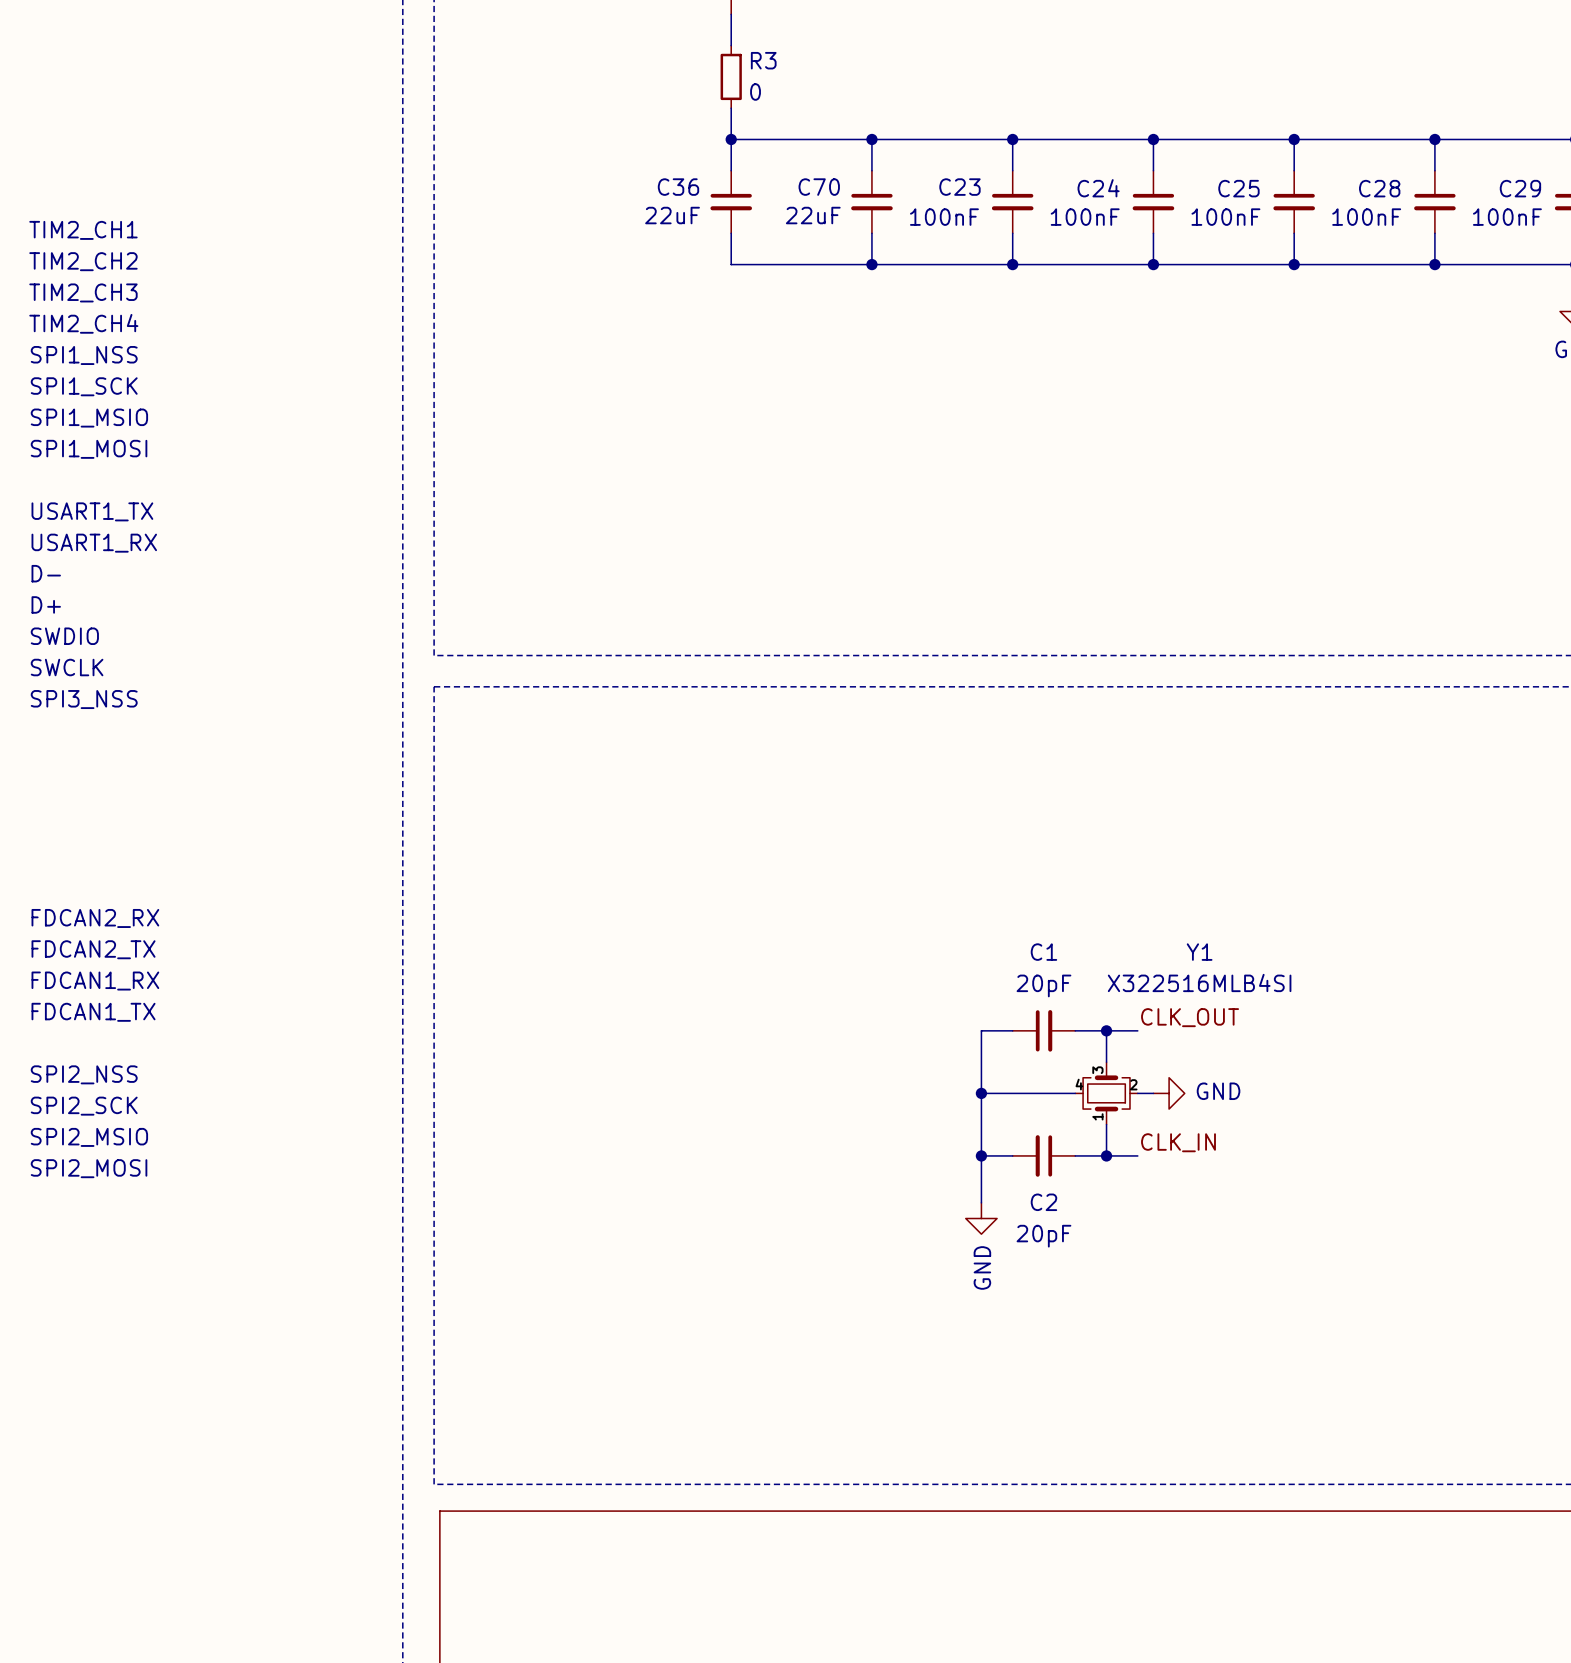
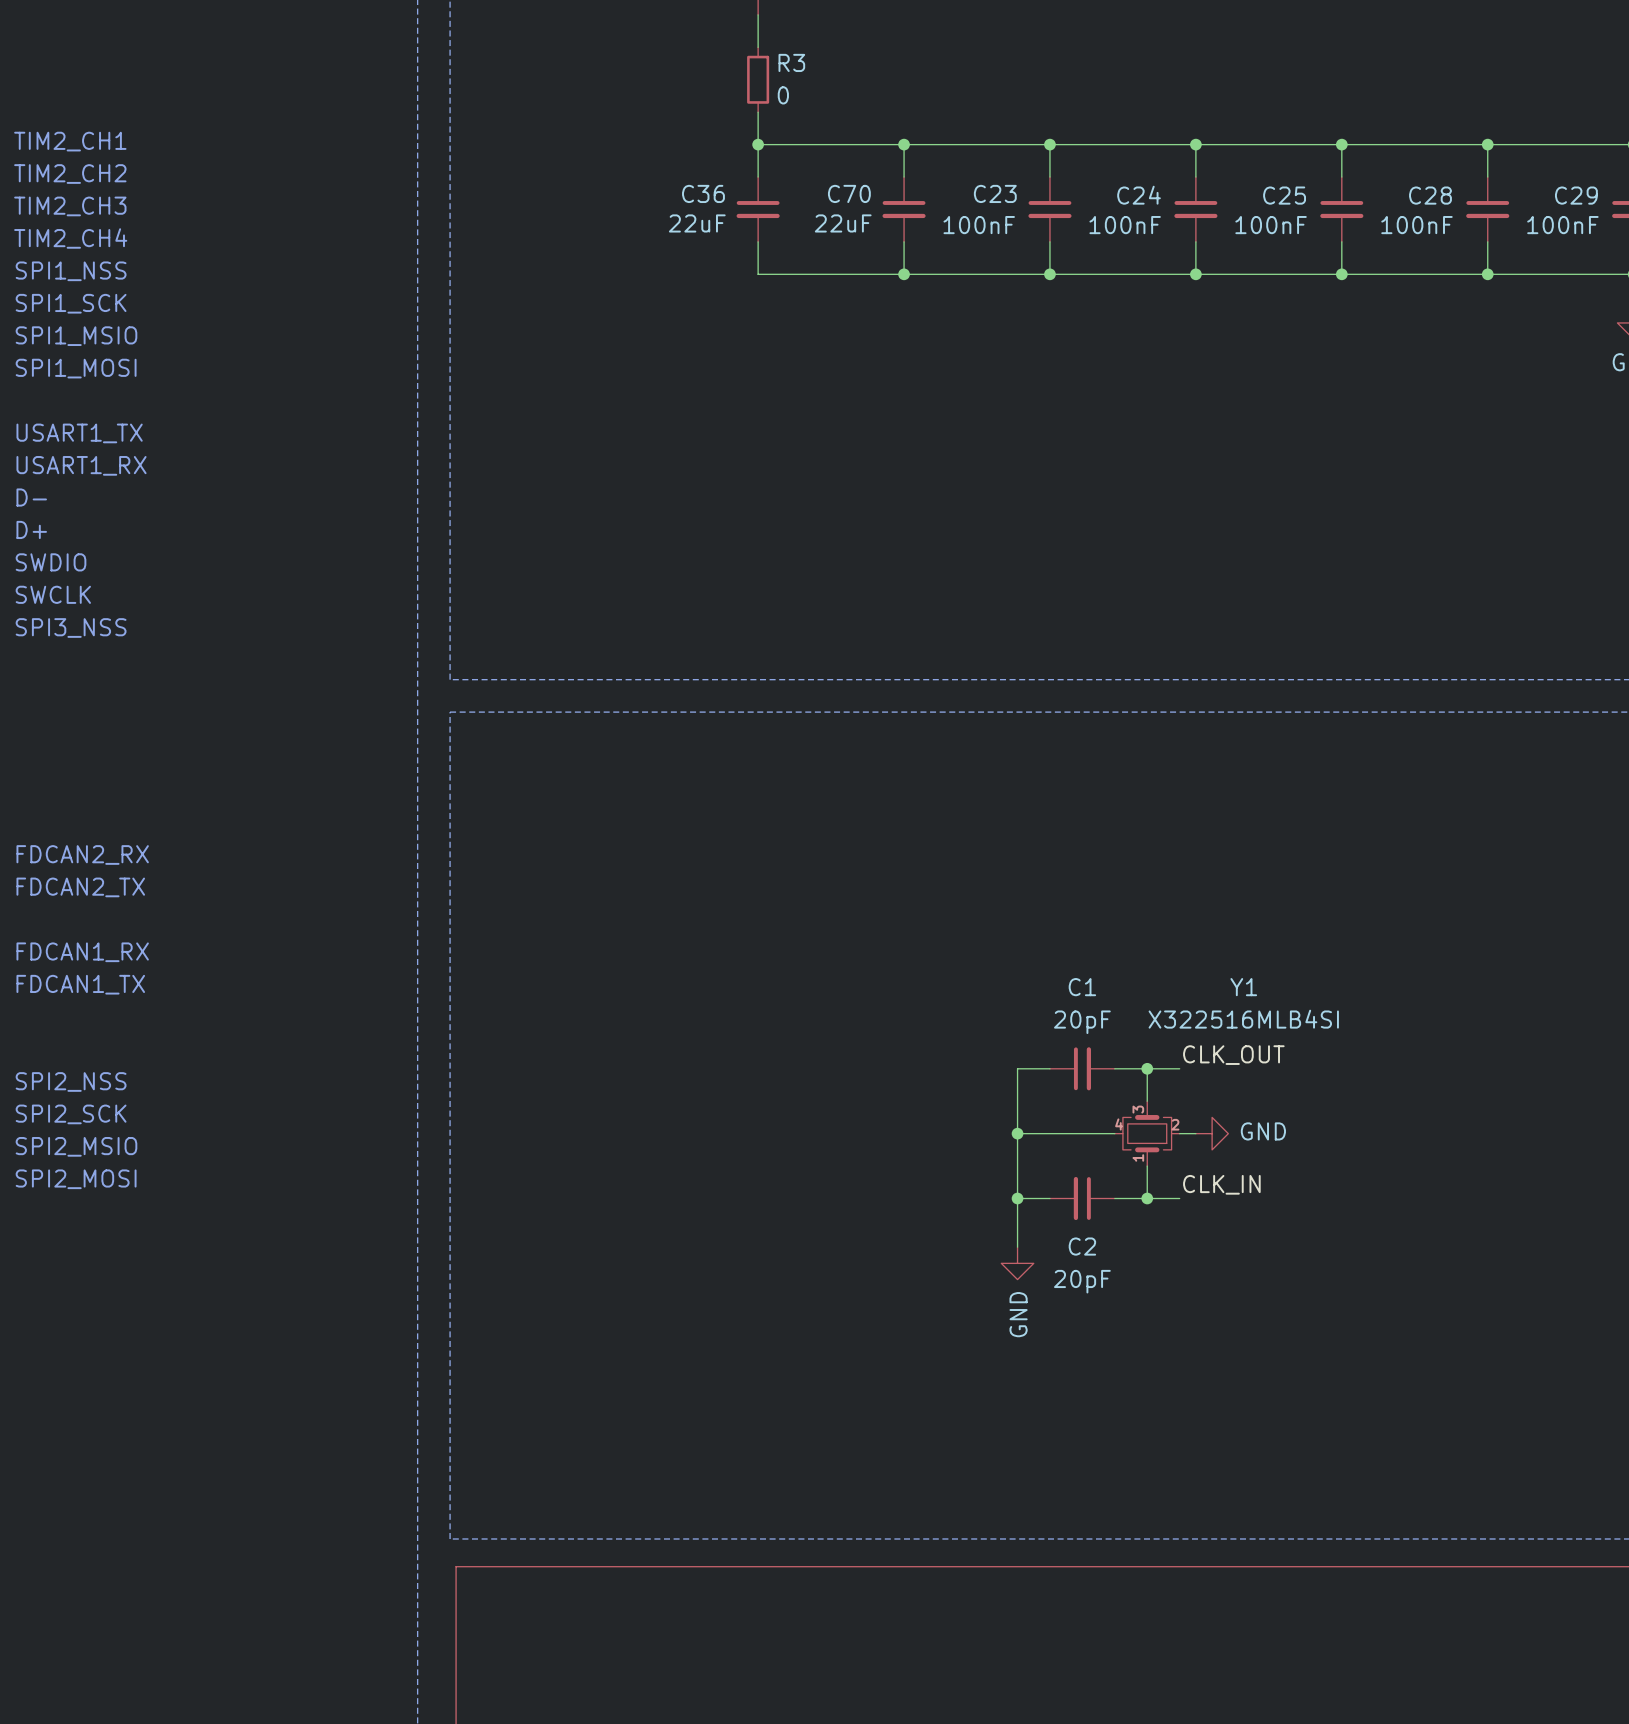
text position: TIM2_CH1 (83, 230) -> TIM2_CH1 (70, 141)
text position: TIM2_CH2 (83, 261) -> TIM2_CH2 (70, 174)
text position: TIM2_CH3 (83, 292) -> TIM2_CH3 (70, 206)
text position: TIM2_CH4 (83, 323) -> TIM2_CH4 (70, 238)
text position: SPI1_NSS (84, 355) -> SPI1_NSS (71, 271)
text position: SPI1_SCK (84, 386) -> SPI1_SCK (71, 303)
text position: SPI1_MSIO (89, 418) -> SPI1_MSIO (76, 336)
text position: SPI1_MOSI (89, 449) -> SPI1_MOSI (76, 368)
text position: USART1_TX (92, 511) -> USART1_TX (79, 433)
text position: USART1_RX (94, 543) -> USART1_RX (81, 465)
text position: D- (46, 573) -> D- (31, 497)
text position: D+ (46, 604) -> D+ (31, 529)
text position: SWDIO (64, 636) -> SWDIO (51, 562)
text position: SWCLK (67, 667) -> SWCLK (53, 594)
text position: SPI3_NSS (84, 699) -> SPI3_NSS (71, 628)
text position: FDCAN2_RX (95, 918) -> FDCAN2_RX (82, 854)
text position: FDCAN2_TX (93, 949) -> FDCAN2_TX (80, 887)
text position: FDCAN1_RX (95, 981) -> FDCAN1_RX (82, 952)
text position: FDCAN1_TX (93, 1012) -> FDCAN1_TX (80, 984)
text position: SPI2_NSS (84, 1074) -> SPI2_NSS (71, 1081)
text position: SPI2_SCK (84, 1106) -> SPI2_SCK (71, 1114)
text position: SPI2_MSIO (89, 1137) -> SPI2_MSIO (76, 1146)
text position: SPI2_MOSI (89, 1168) -> SPI2_MOSI (76, 1179)

